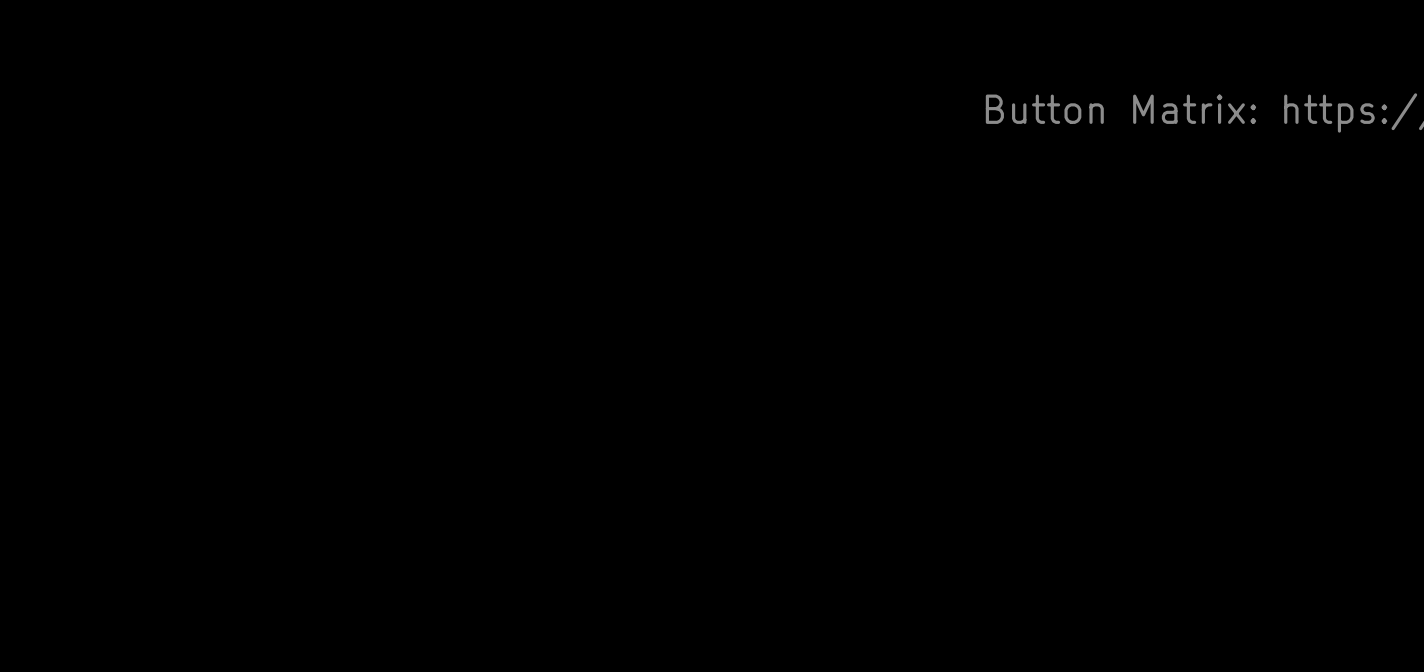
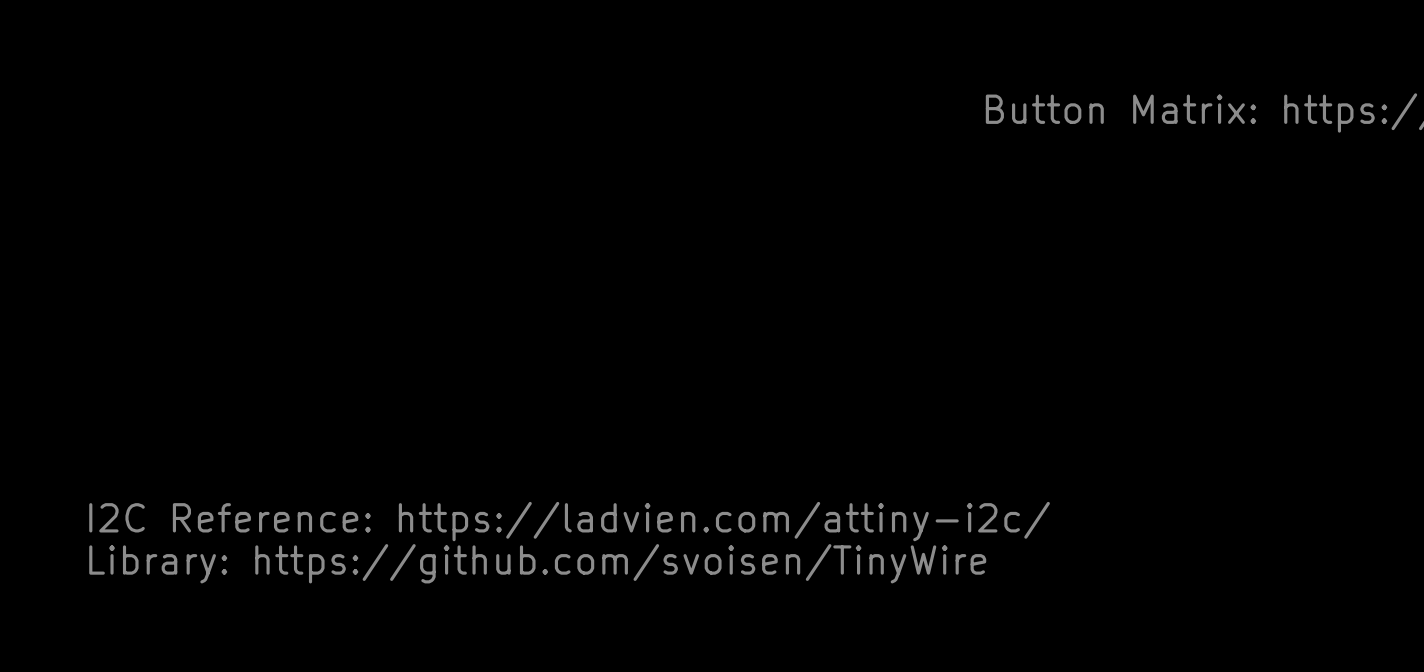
text: none -> I2C Reference: https://ladvien.com/attiny-i2c/ (569, 521)
text: none -> Library: https://github.com/svoisen/TinyWire (537, 563)

